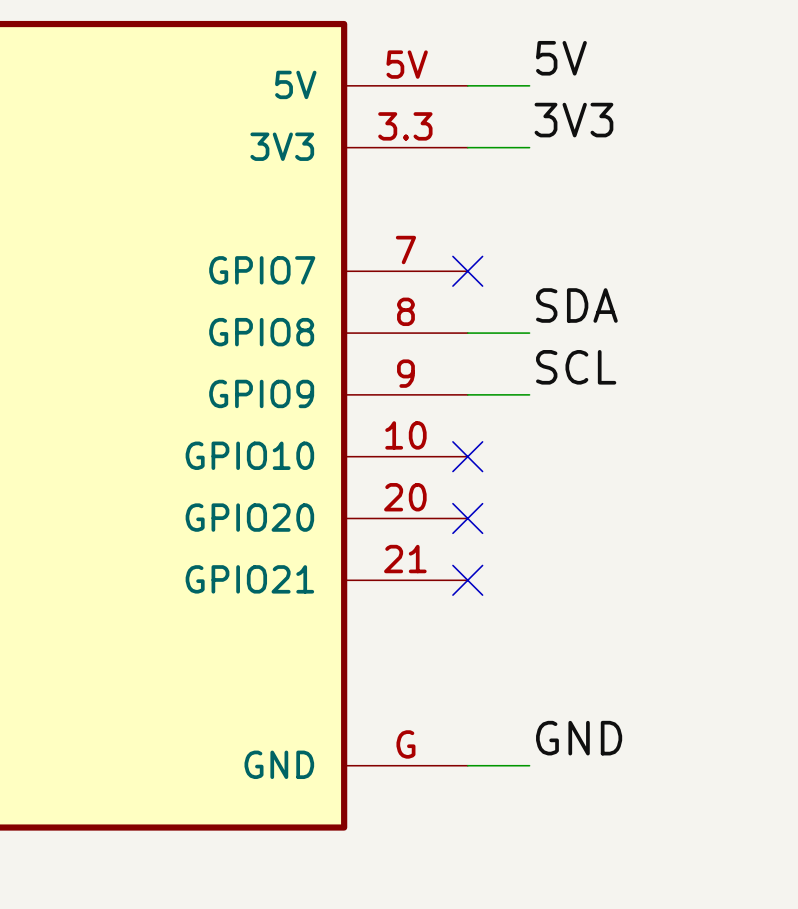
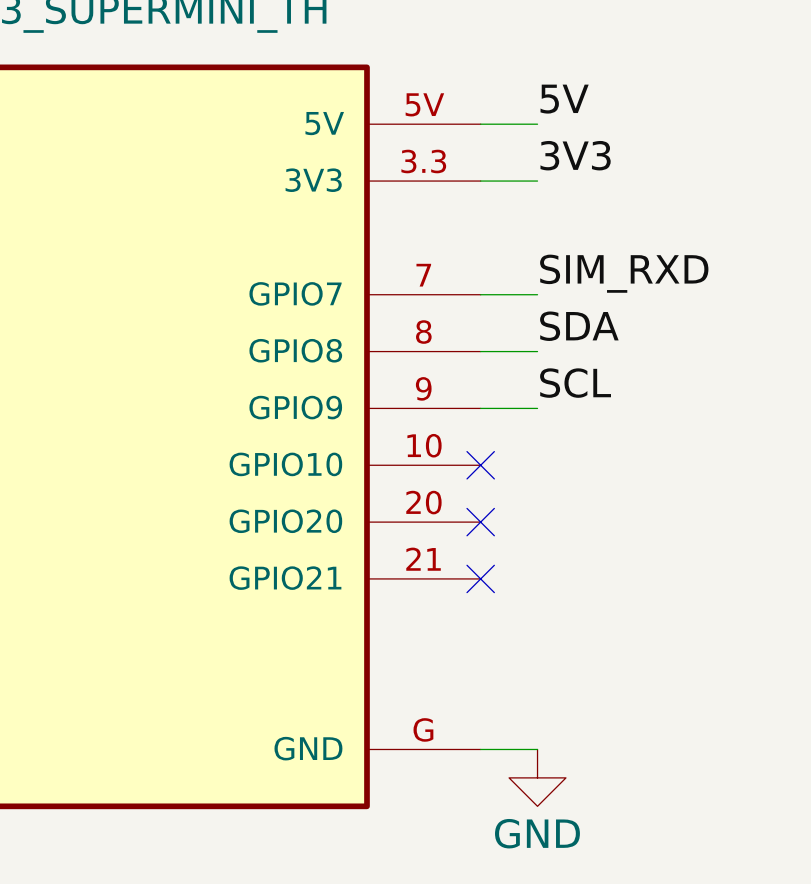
label: none -> SIM_RXD (624, 273)
wire: none -> (480, 294) (537, 294)
no-connect mark: (467, 271) -> none
label: GND (579, 738) -> none
power symbol: none -> GND (537, 777)

